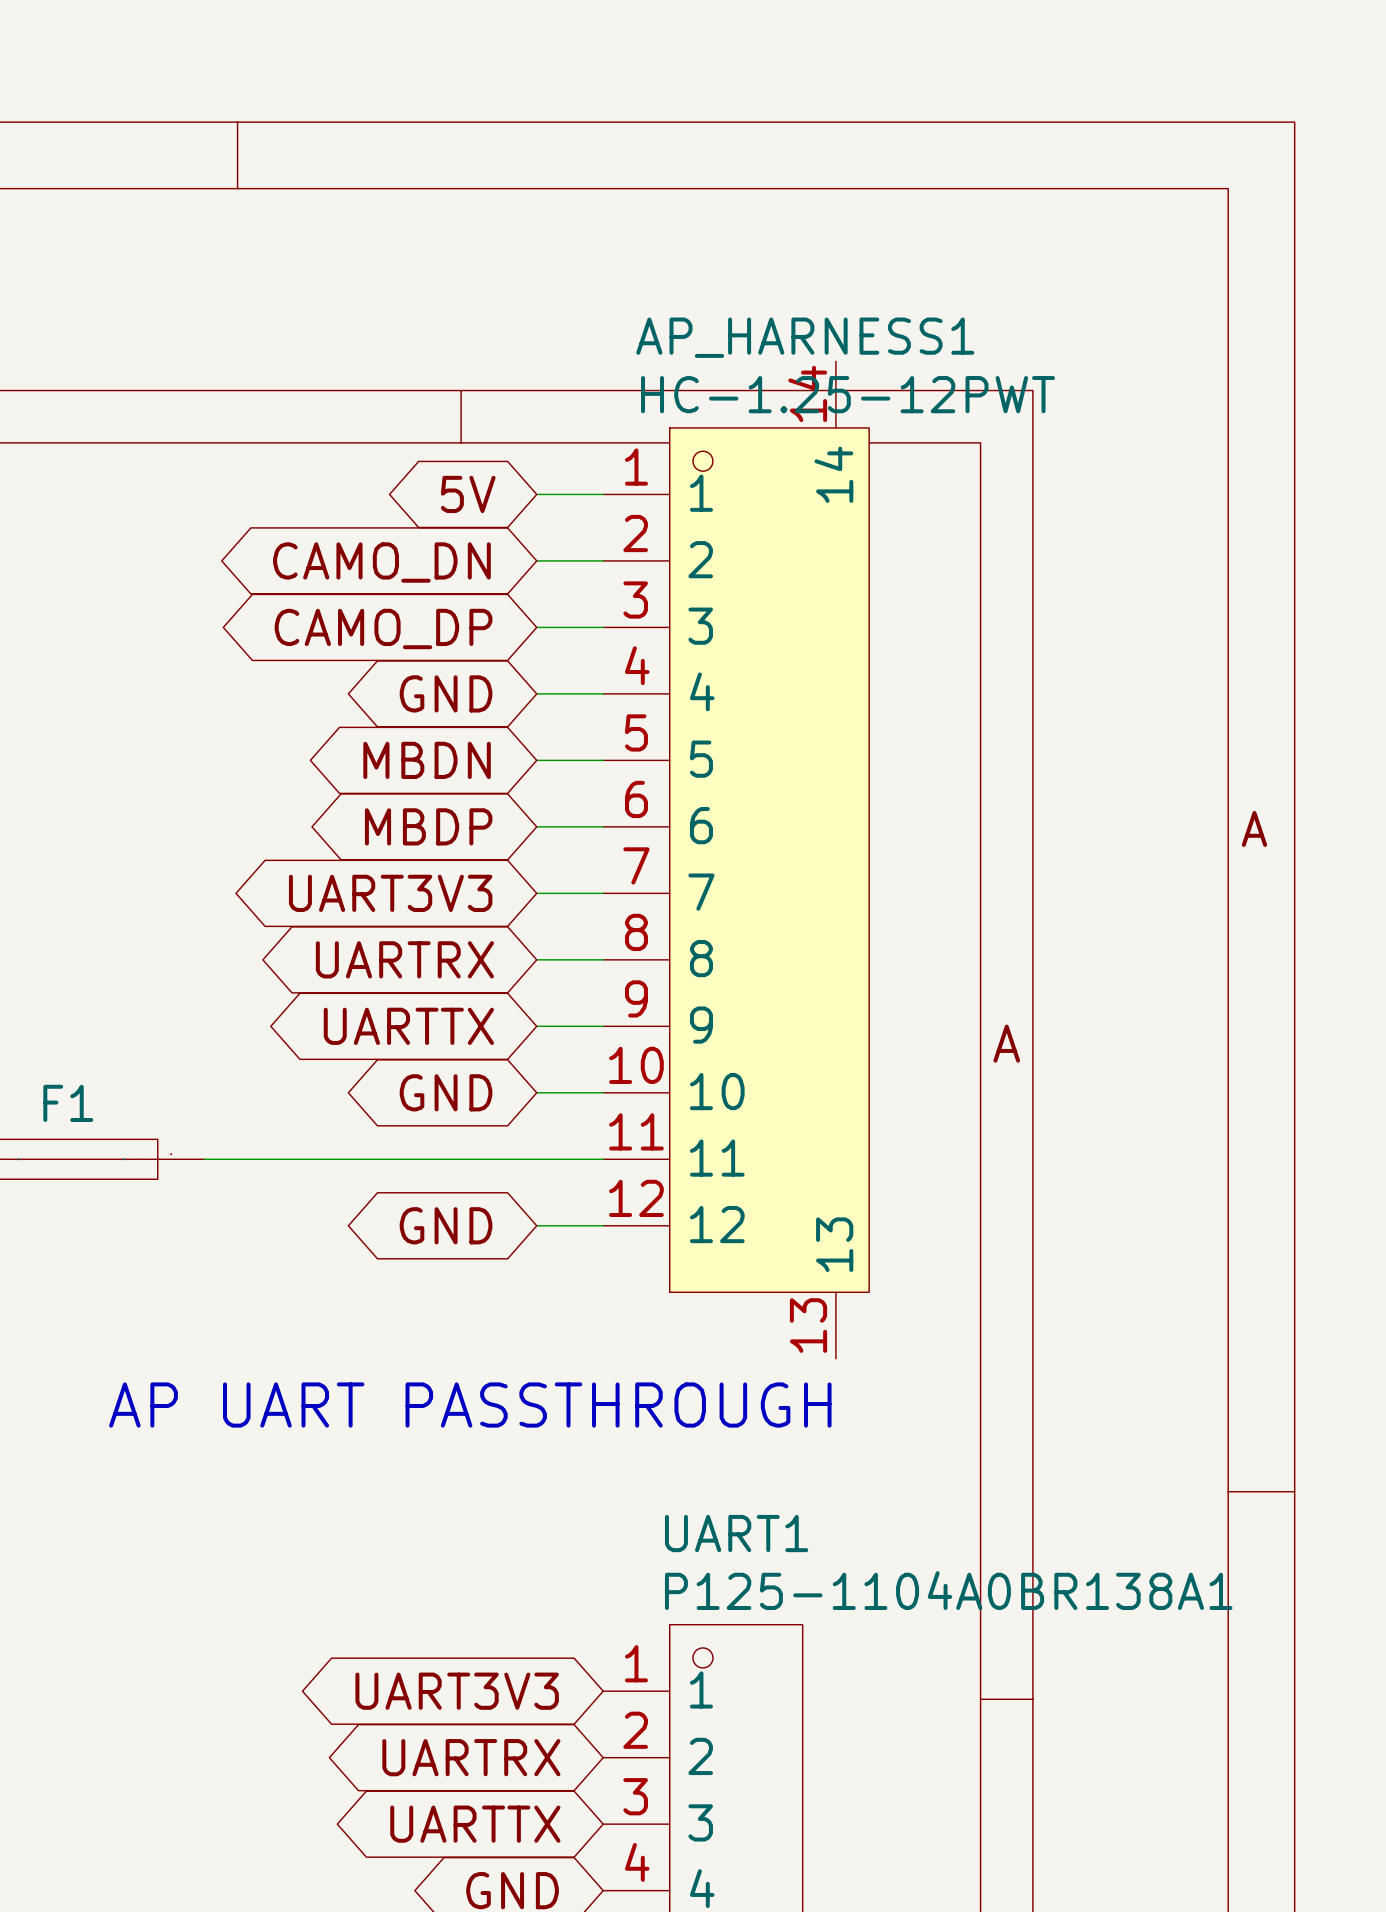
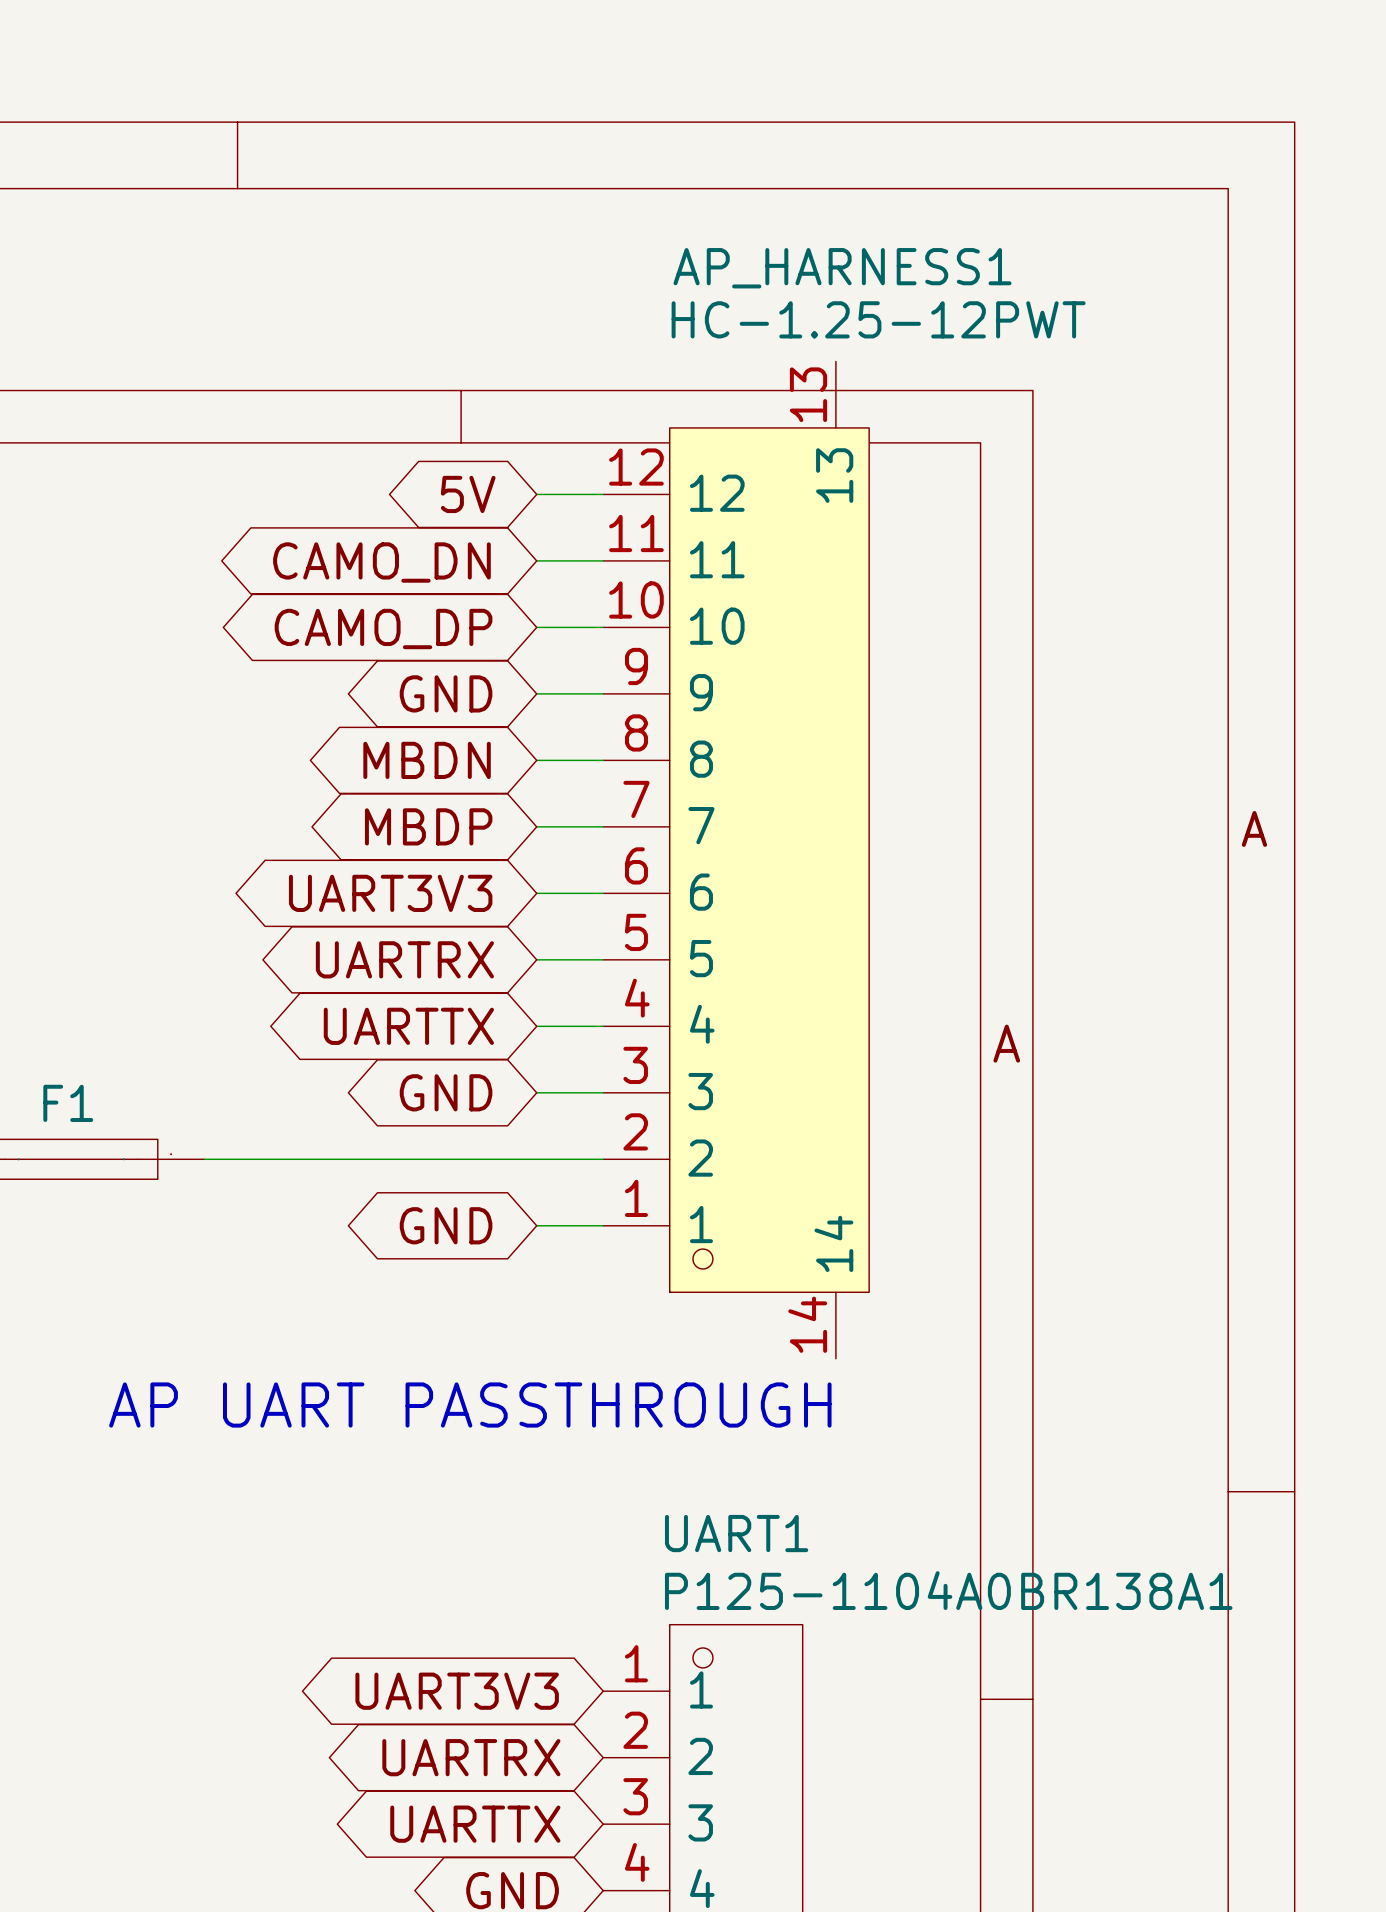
AP_HARNESS1 name position: AP_HARNESS1 (805, 337) -> AP_HARNESS1 (842, 268)
AP_HARNESS1 value position: HC-1.25-12PWT (848, 394) -> HC-1.25-12PWT (878, 319)
AP_HARNESS1 flip: as is (769, 860) -> up-down (769, 860)

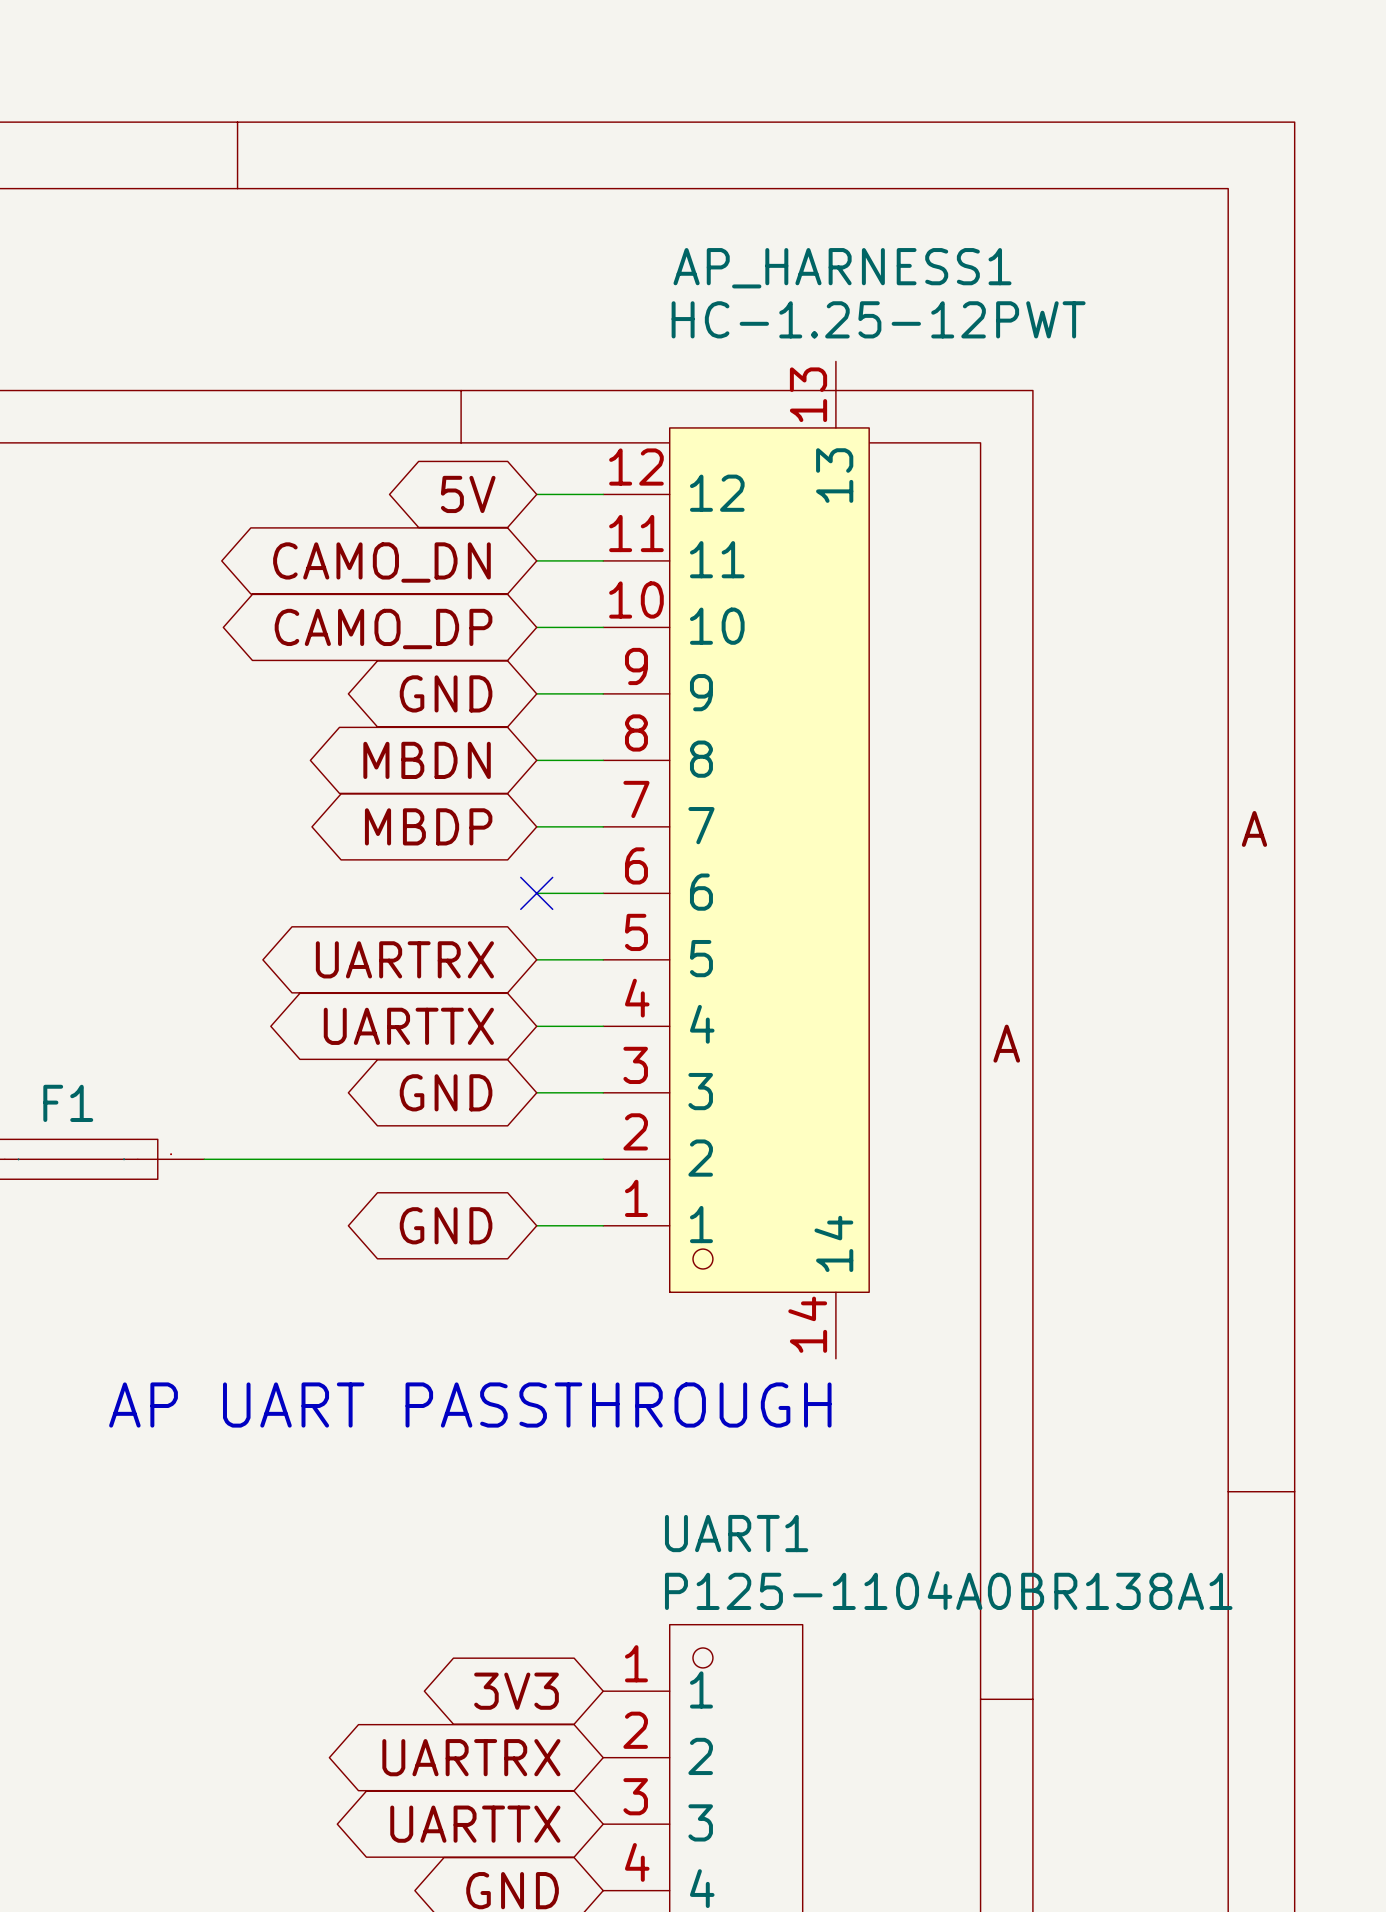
global label: UART3V3 (390, 893) -> none
no-connect mark: none -> (536, 893)
global label: UART3V3 (457, 1691) -> 3V3 (516, 1691)

